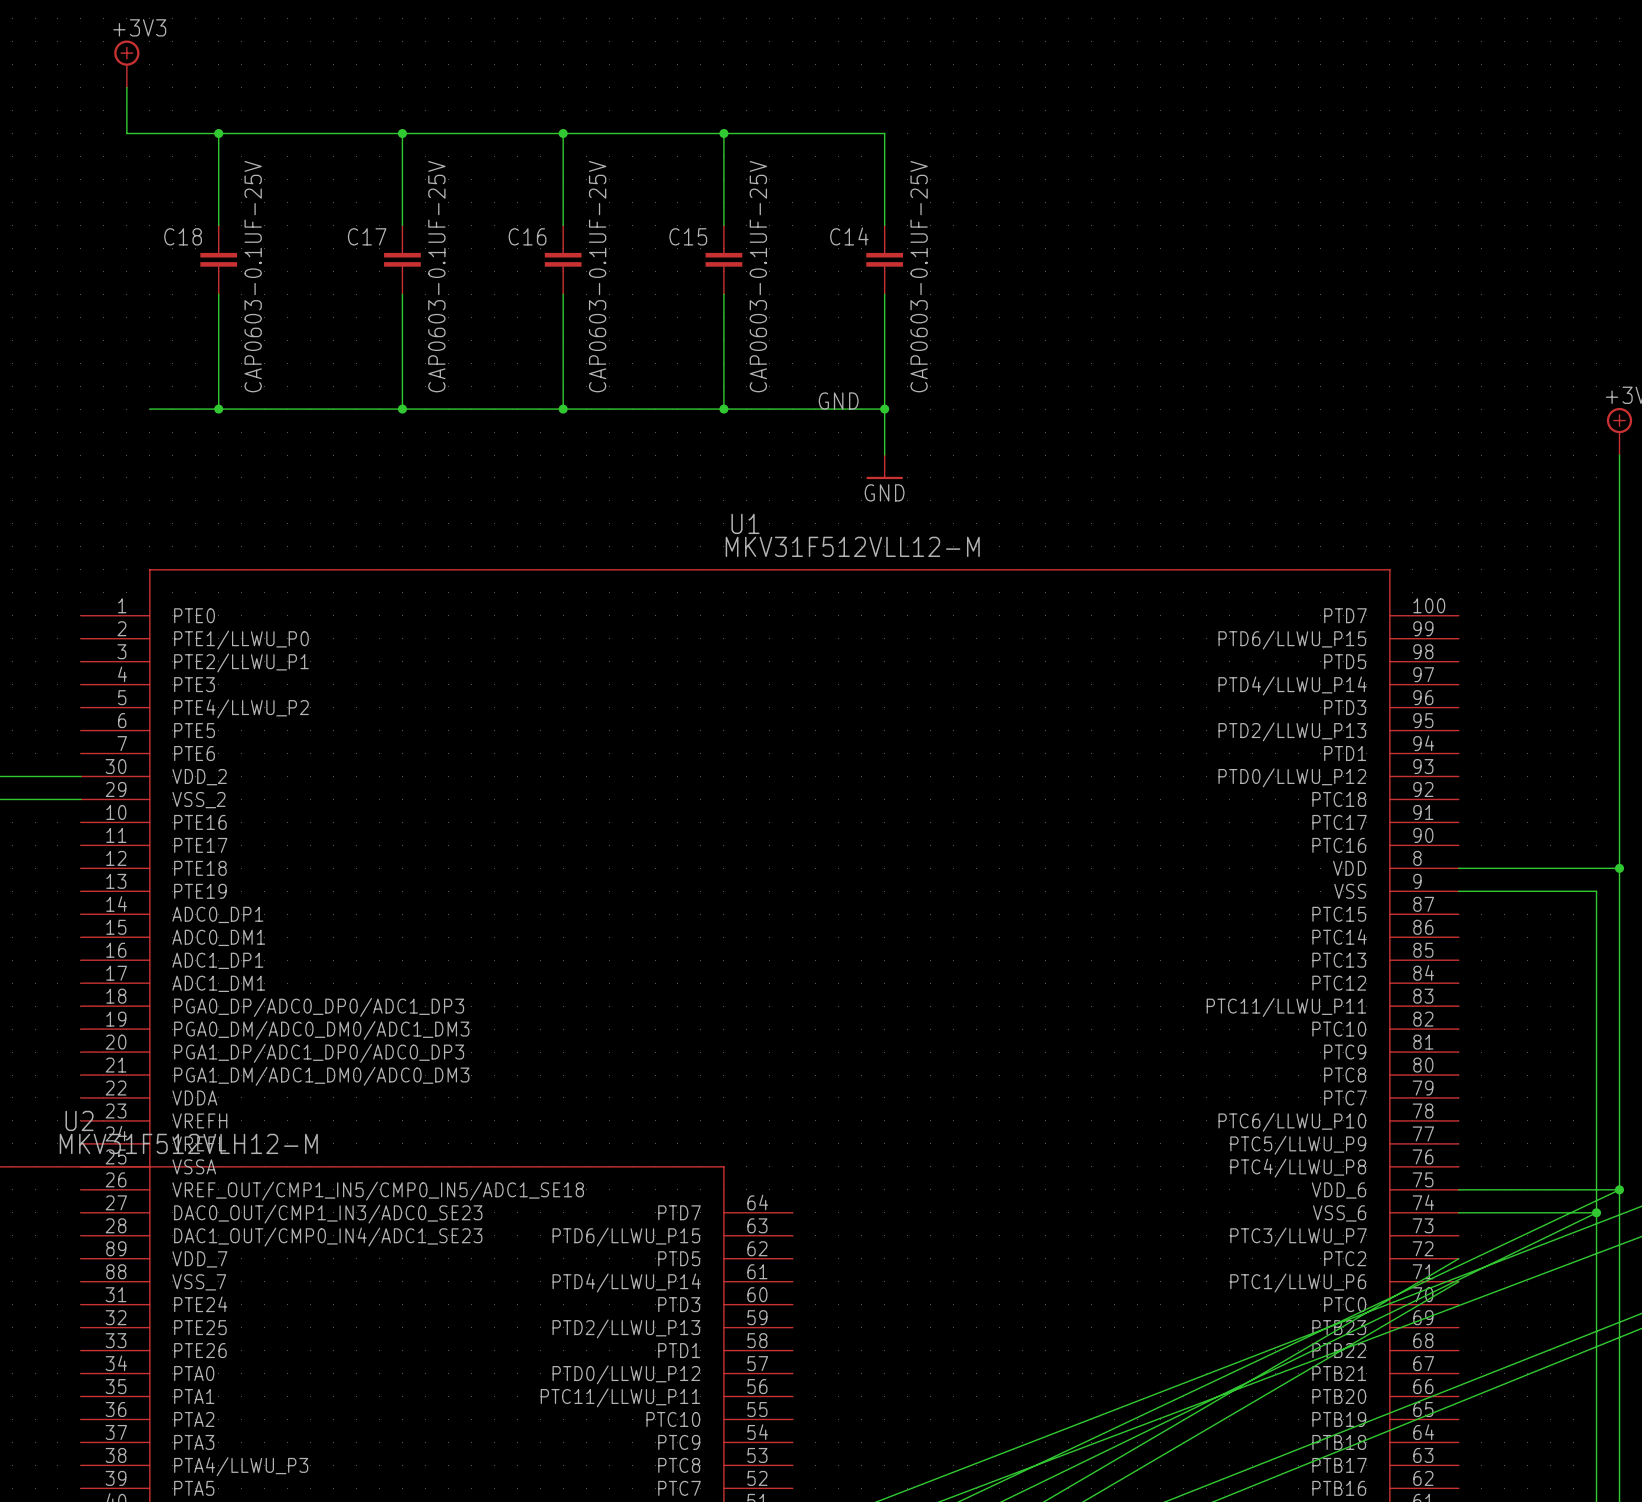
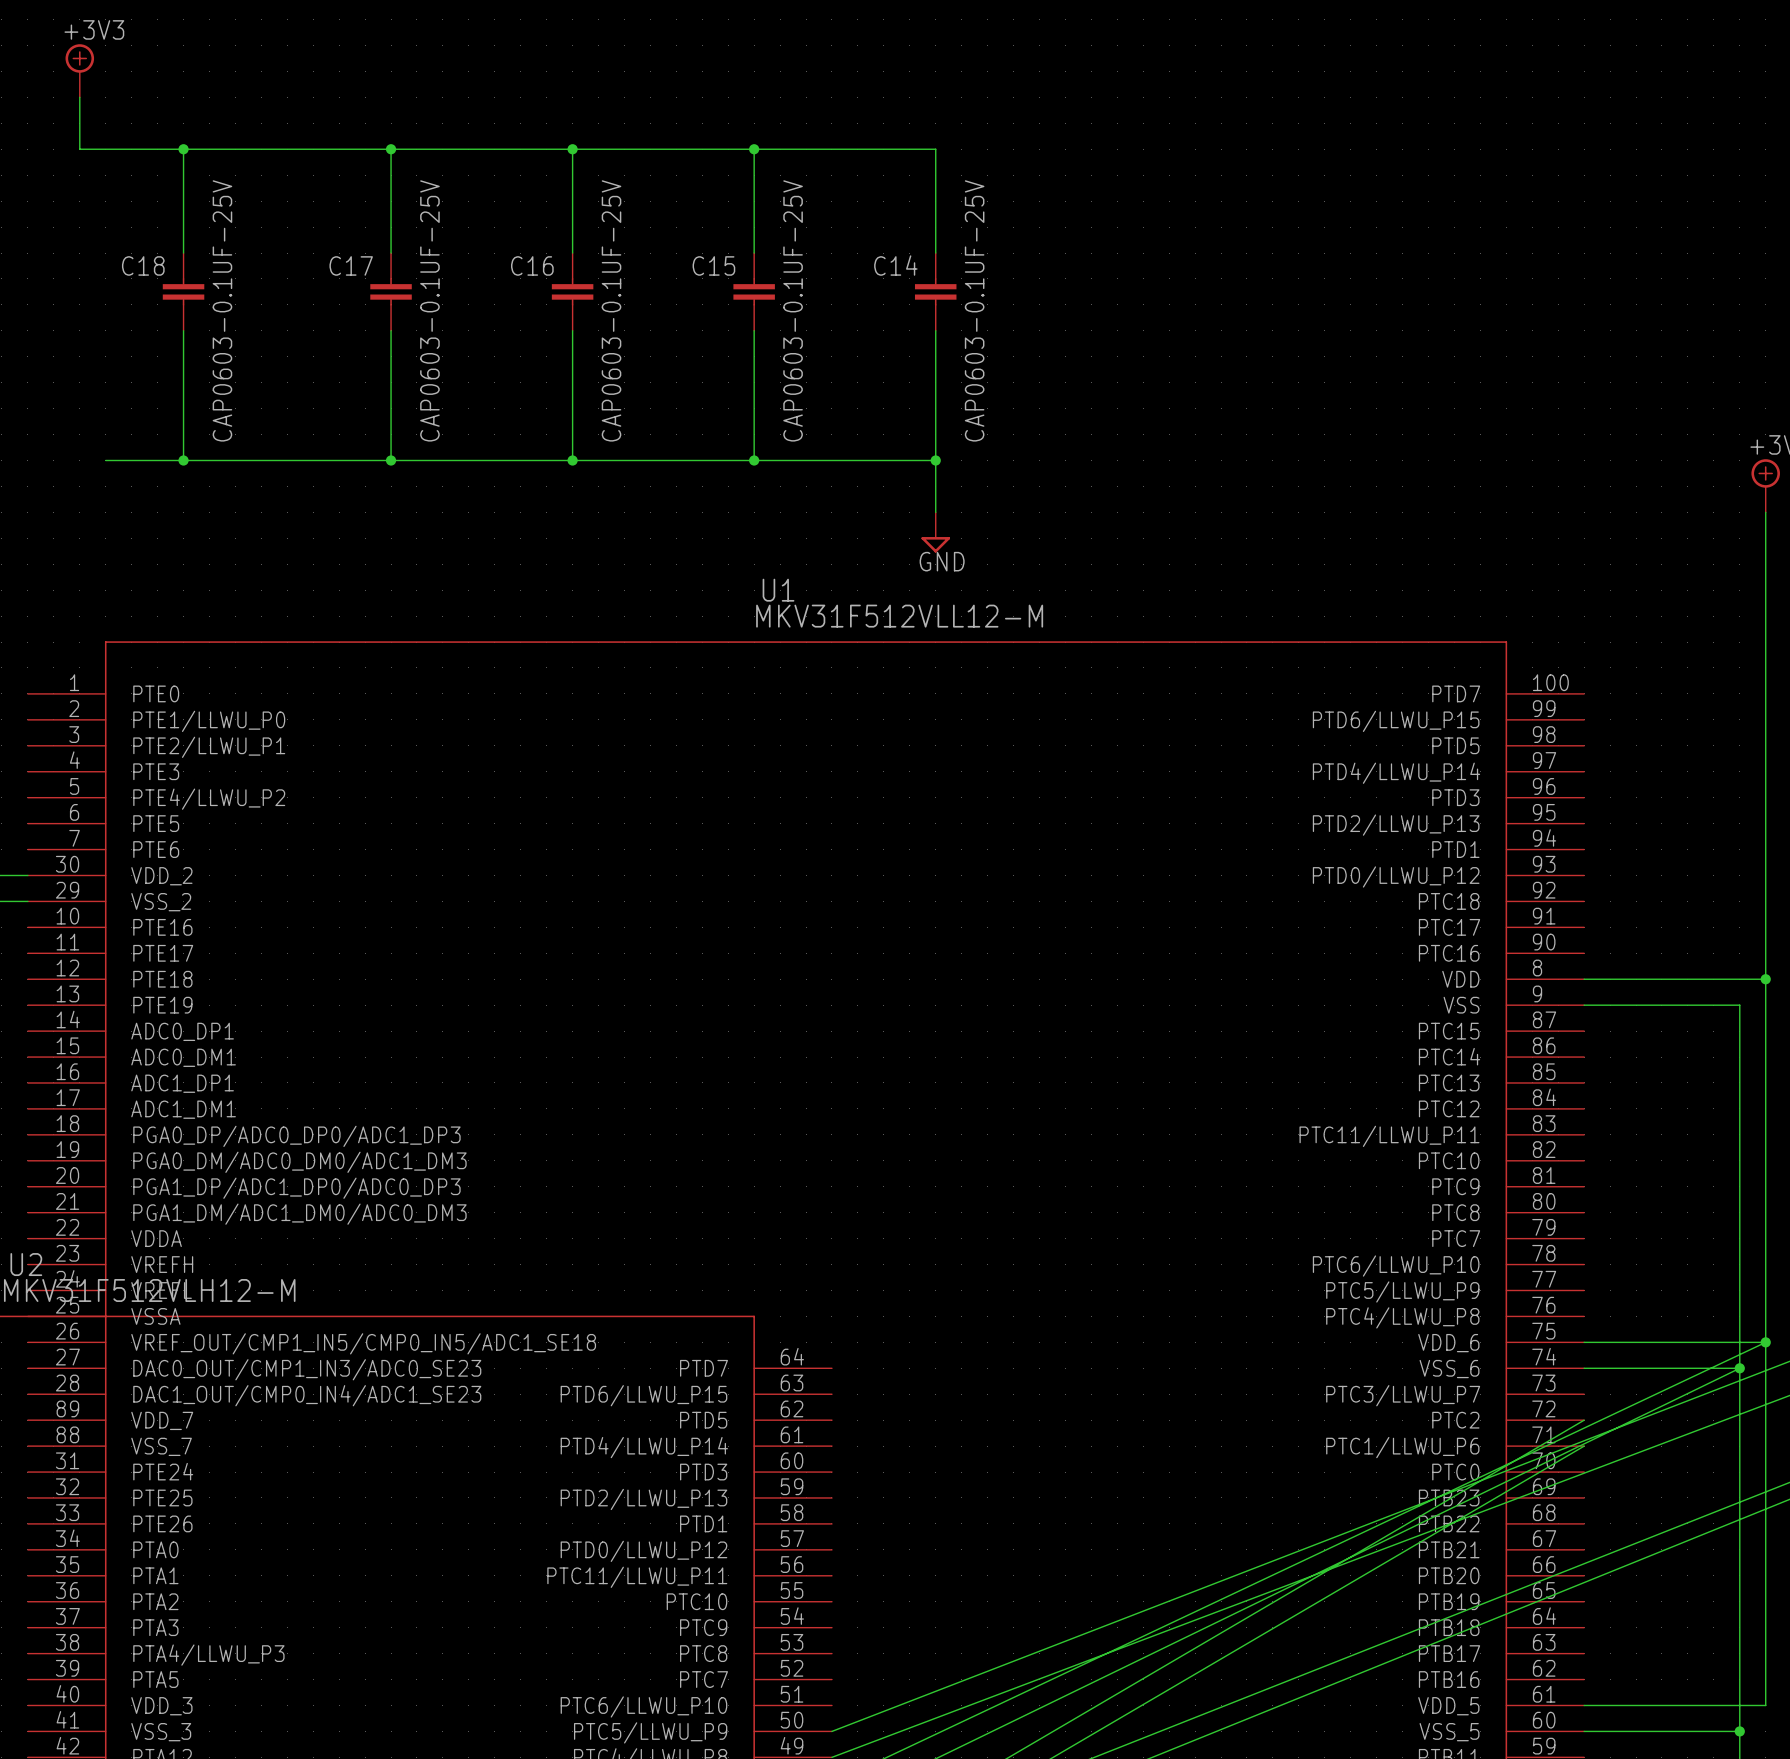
label: GND (838, 401) -> none
power symbol shape: [866, 455, 904, 480] -> [921, 512, 950, 553]

